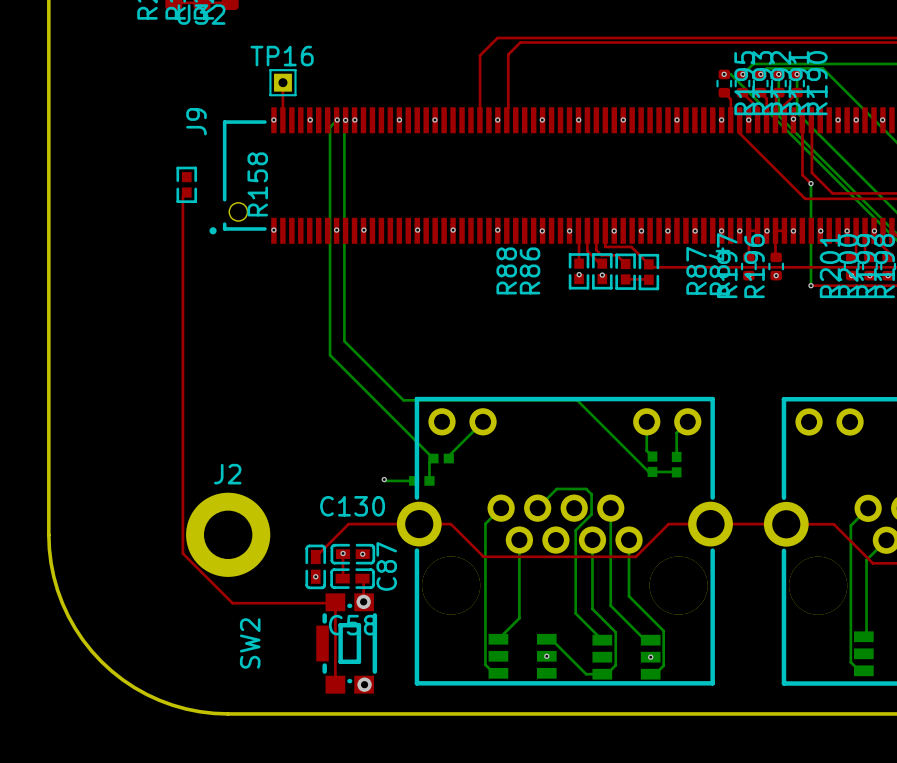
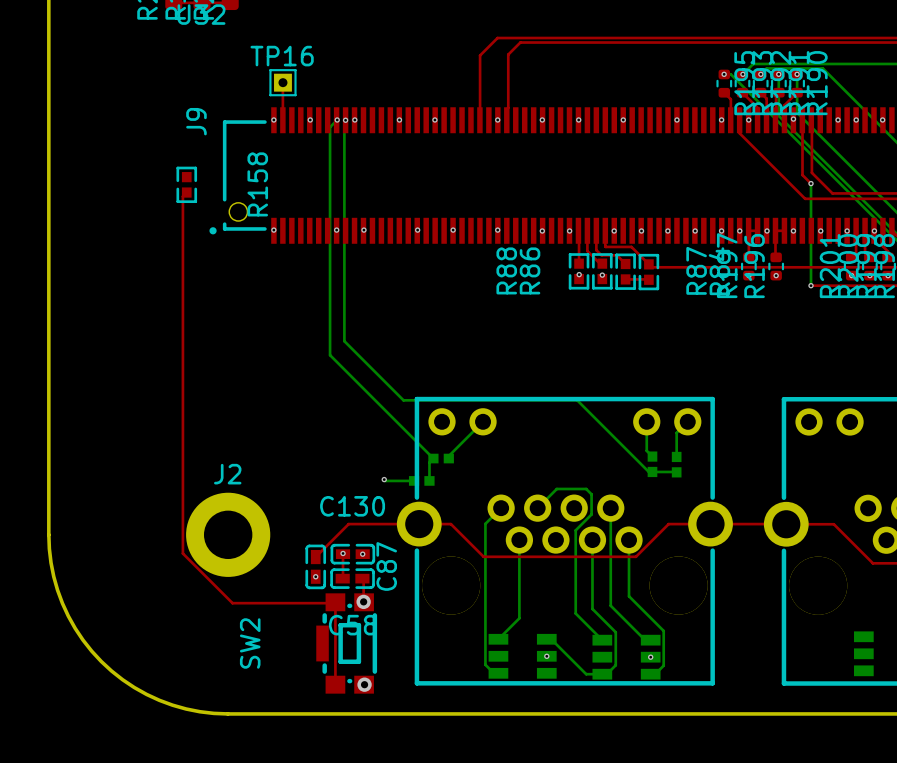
bottom track: (868, 508) (850, 525) (850, 662) (859, 670) (863, 670) -> none
bottom track: (886, 540) (866, 560) (866, 634) (863, 636) -> none

